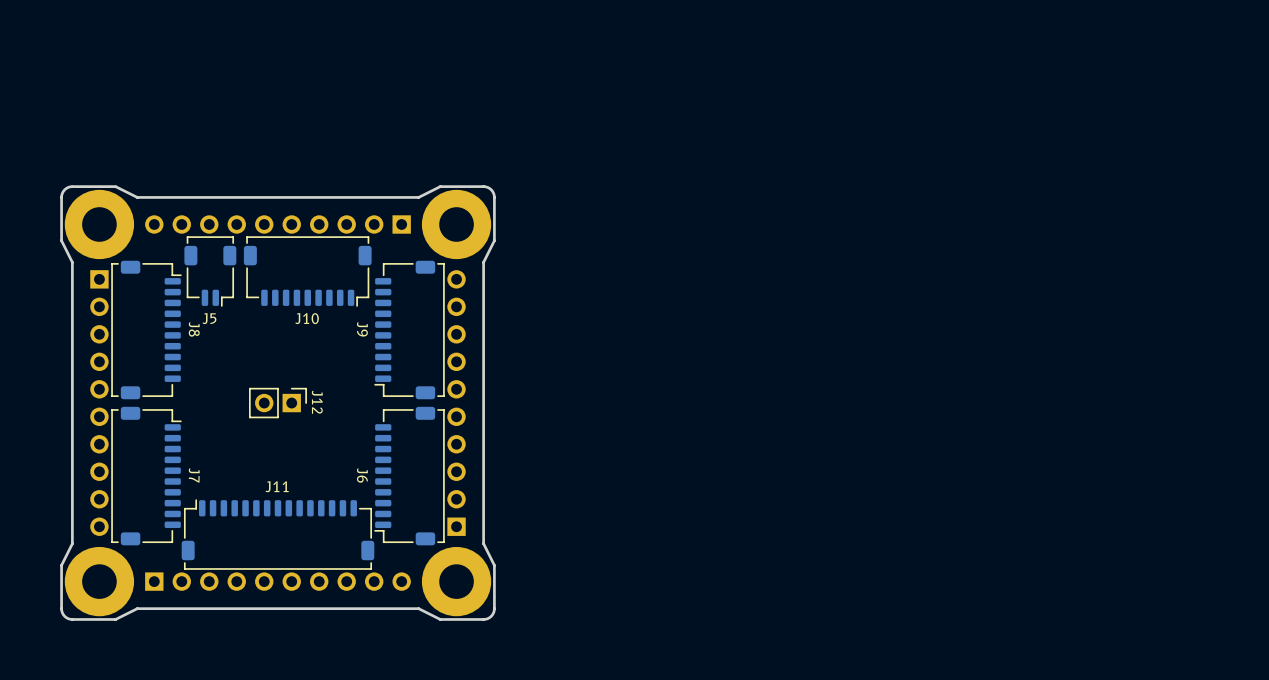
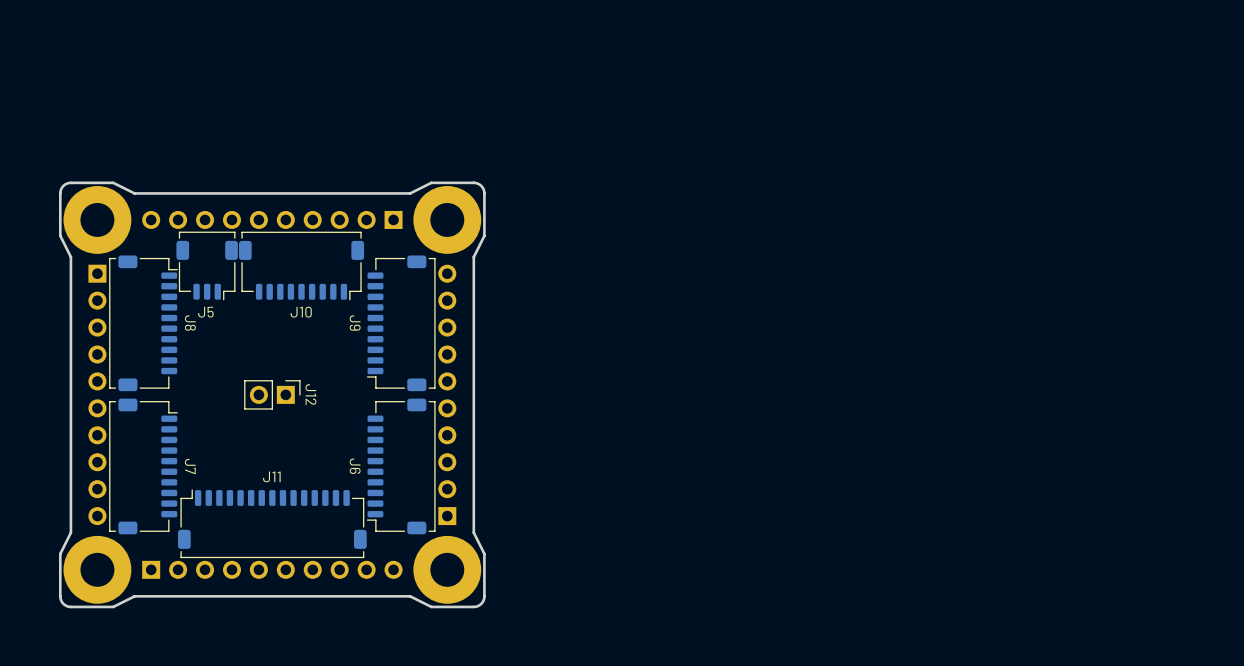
J5 footprint: [184, 236, 237, 307] -> [176, 231, 238, 301]

